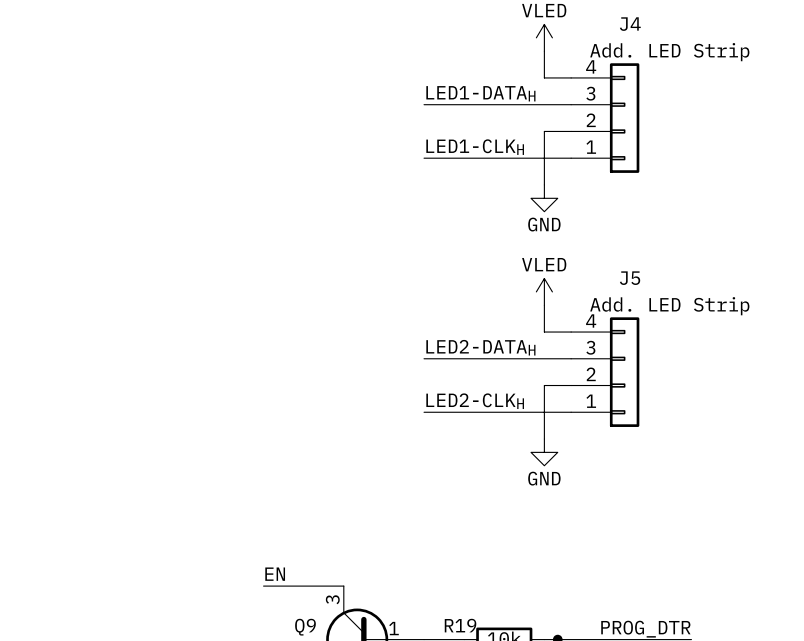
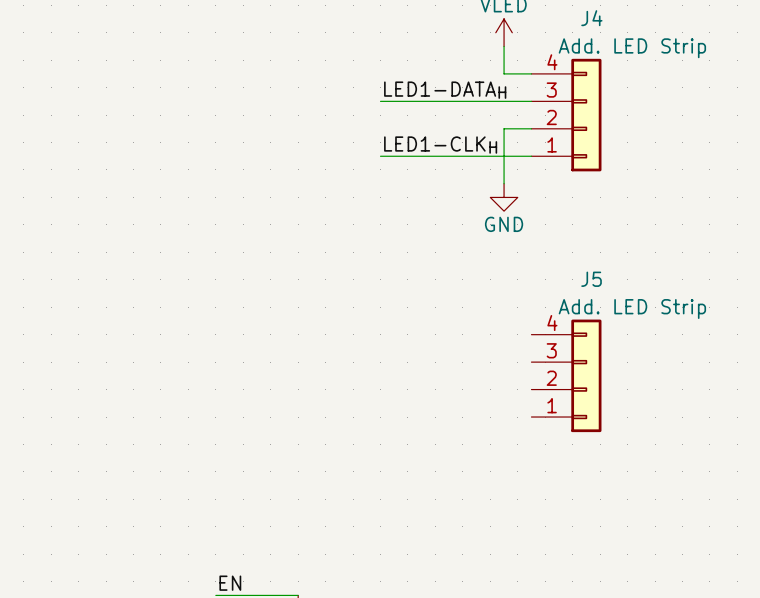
power symbol: VLED (544, 291) -> none
wire: (544, 305) (544, 332) (571, 332) -> none
label: LED2-DATAH (480, 347) -> none
wire: (424, 358) (571, 358) -> none
wire: (571, 385) (544, 385) (544, 439) -> none
label: LED2-CLKH (475, 401) -> none
wire: (424, 412) (571, 412) -> none
power symbol: GND (544, 452) -> none

